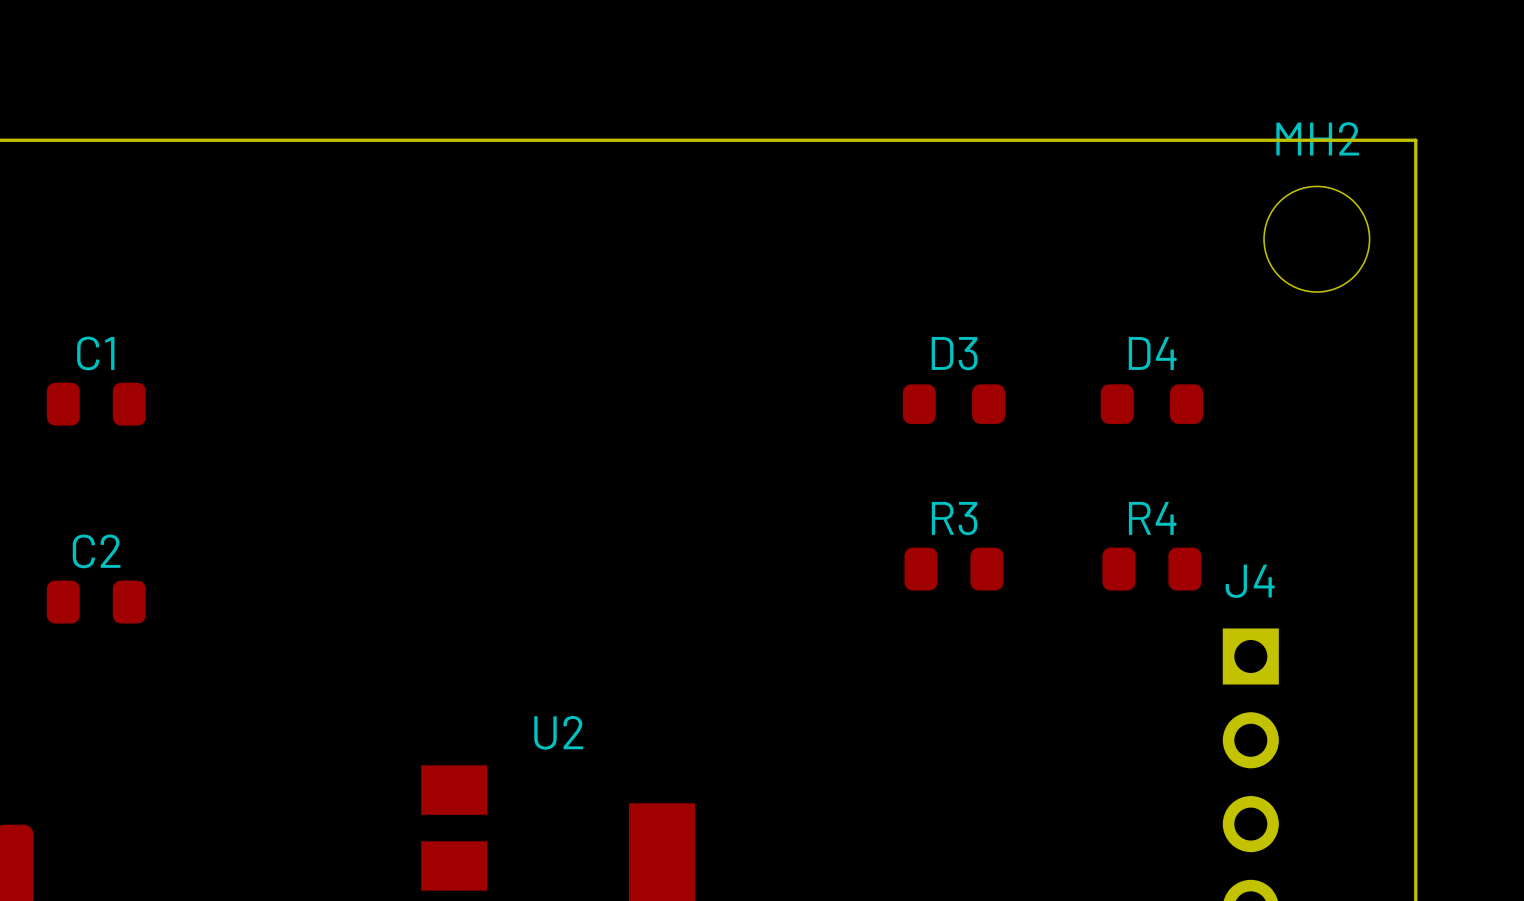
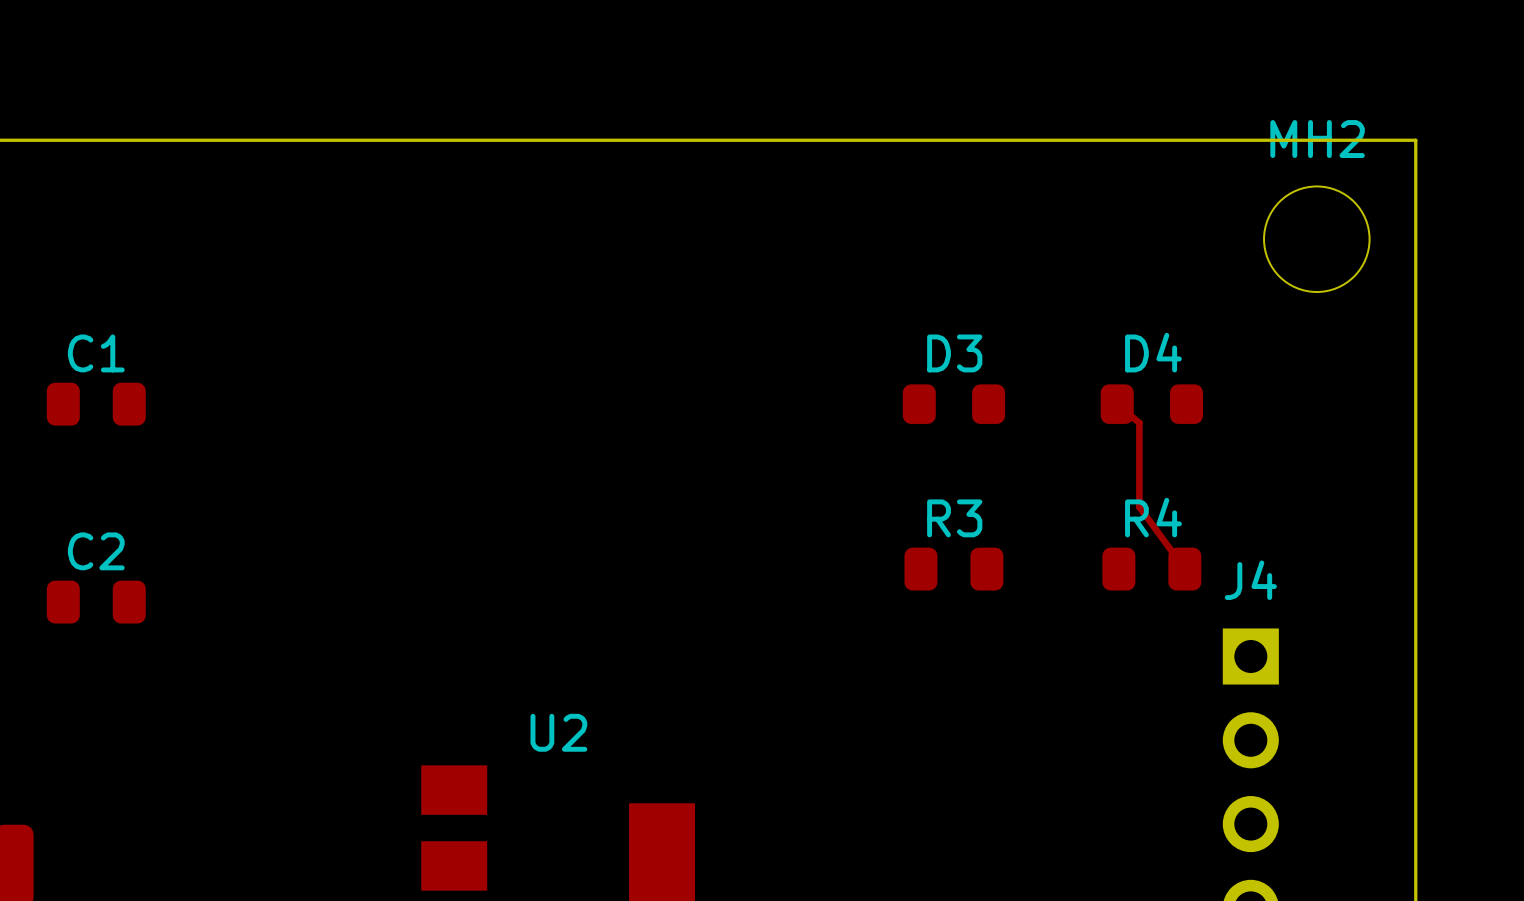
top track: none -> (1117, 404) (1139, 423) (1139, 506) (1184, 569)

